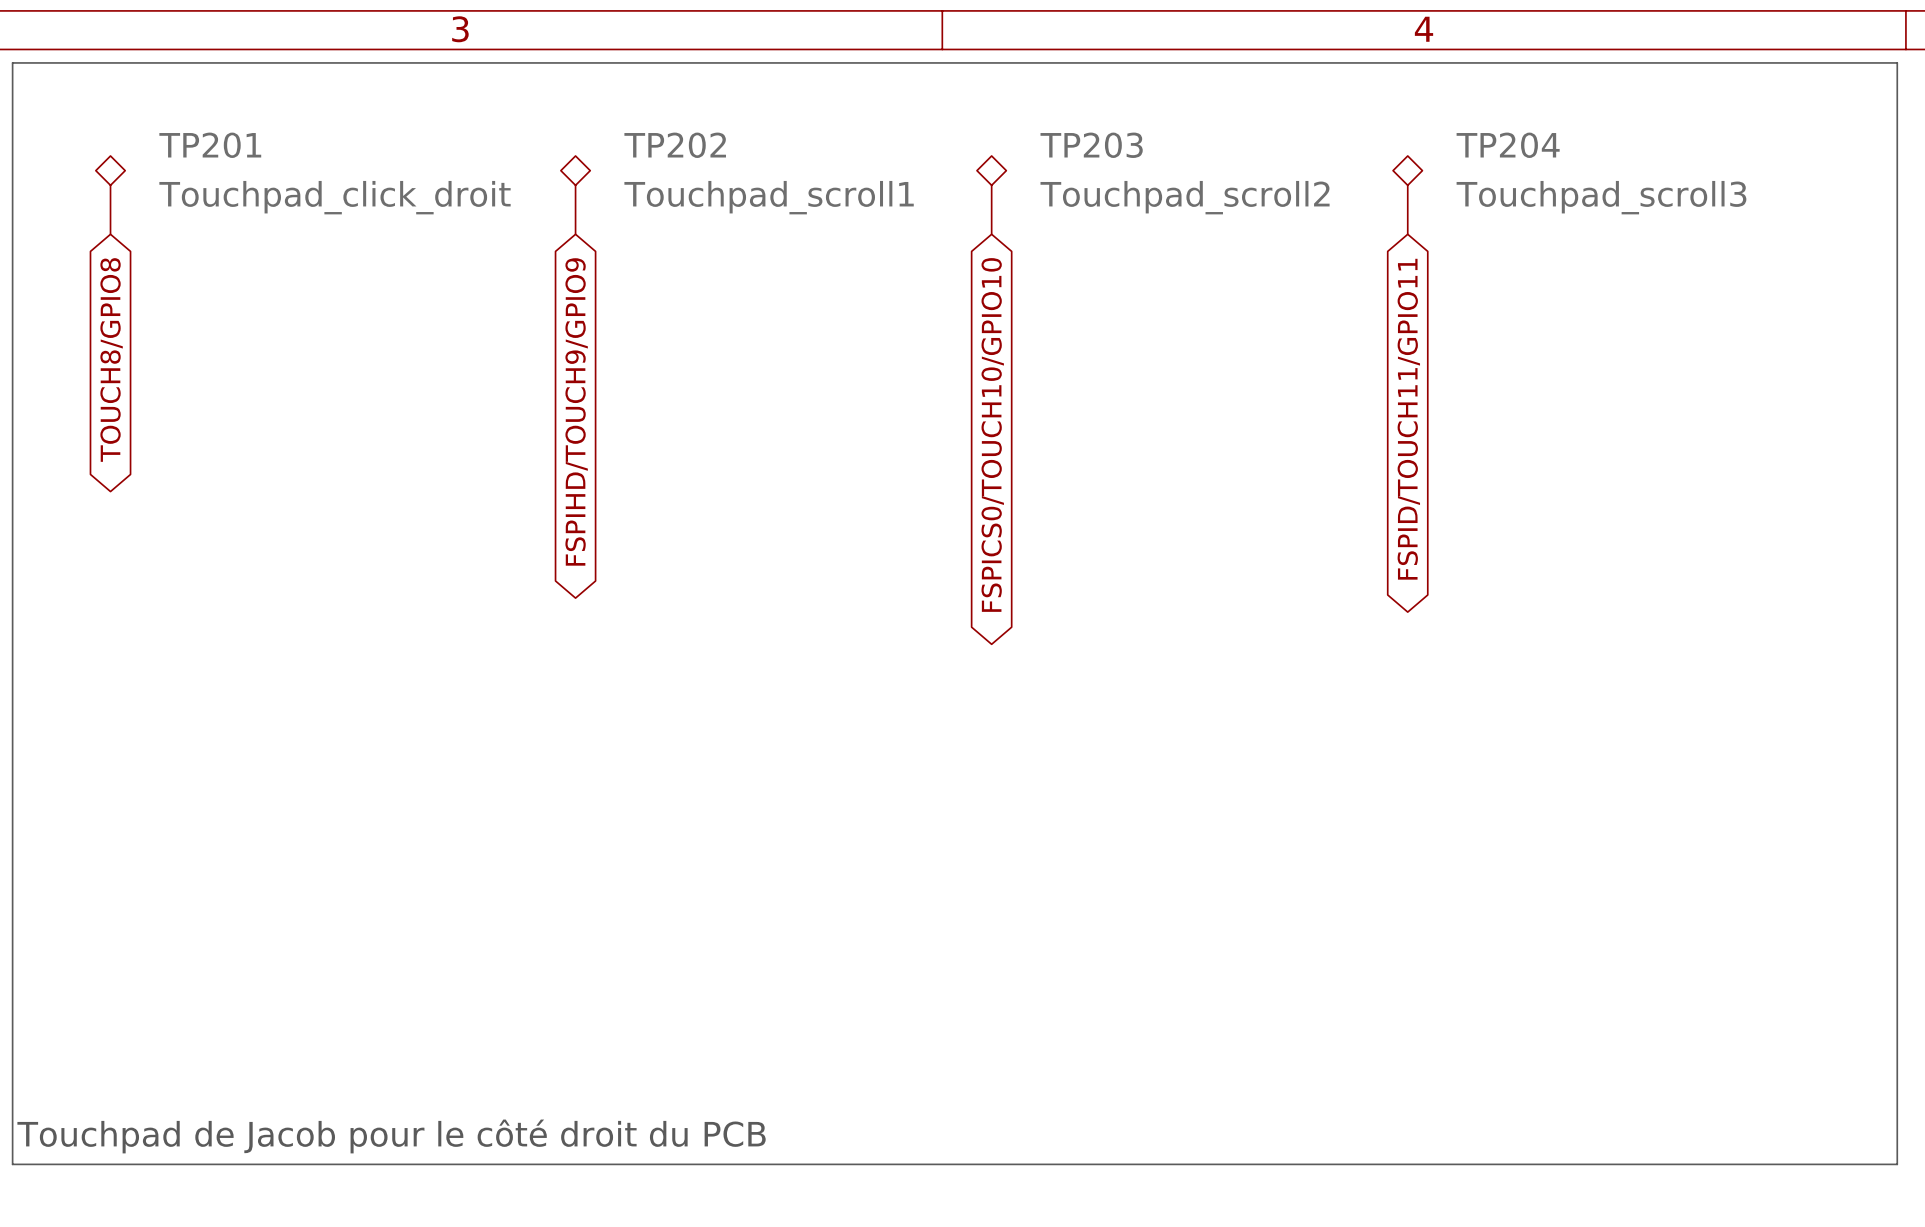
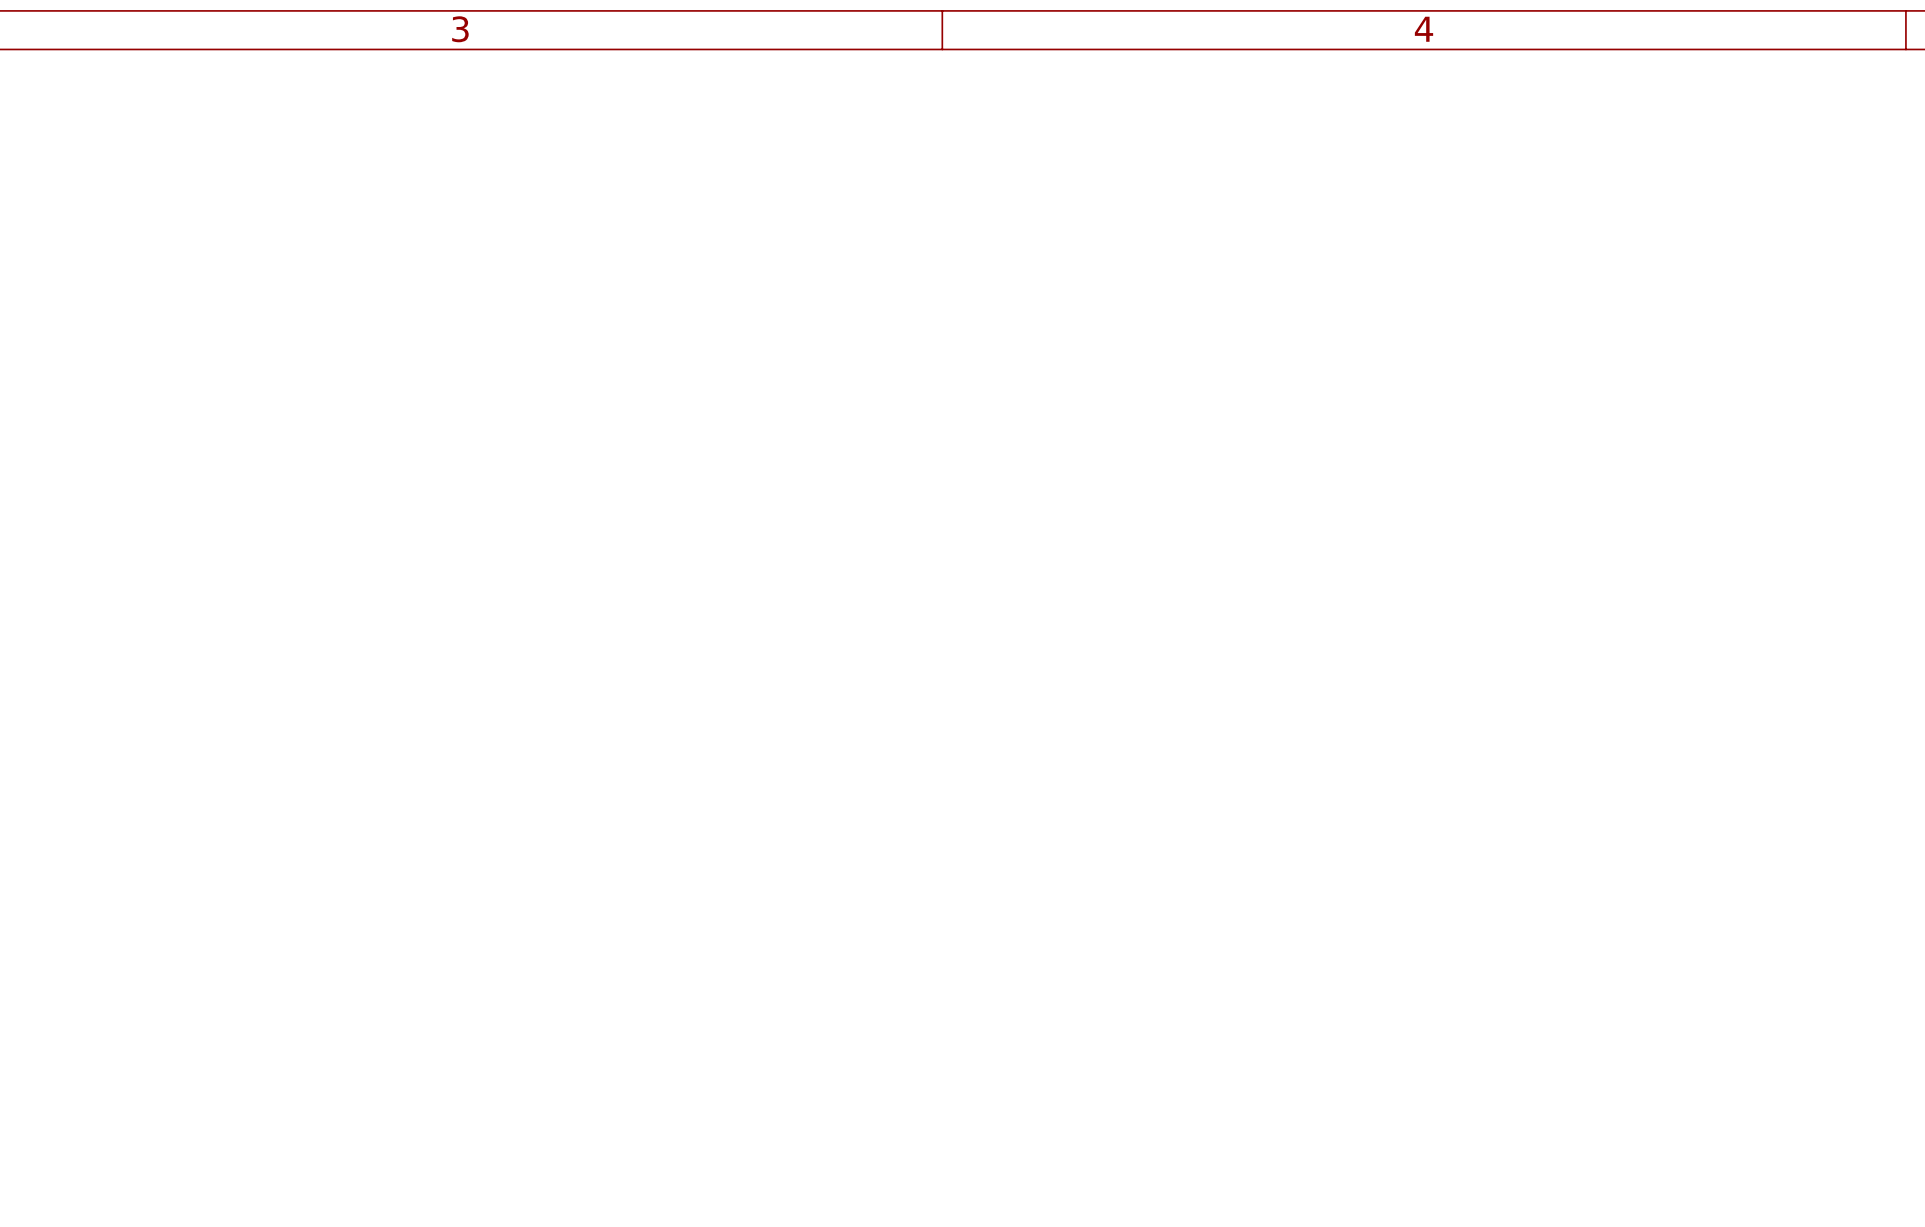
line: (12, 62) (1897, 62) (1897, 1164) (12, 1164) (12, 62) -> none
TP201: Touchpad_click_droit (110, 195) -> none
TP202: Touchpad_scroll1 (575, 195) -> none
TP203: Touchpad_scroll2 (991, 195) -> none
TP204: Touchpad_scroll3 (1407, 195) -> none
global label: TOUCH8/GPIO8 (111, 360) -> none
global label: FSPIHD/TOUCH9/GPIO9 (576, 411) -> none
global label: FSPID/TOUCH11/GPIO11 (1408, 419) -> none
global label: FSPICS0/TOUCH10/GPIO10 (992, 434) -> none
text: Touchpad de Jacob pour le côté droit du PCB (391, 1136) -> none

